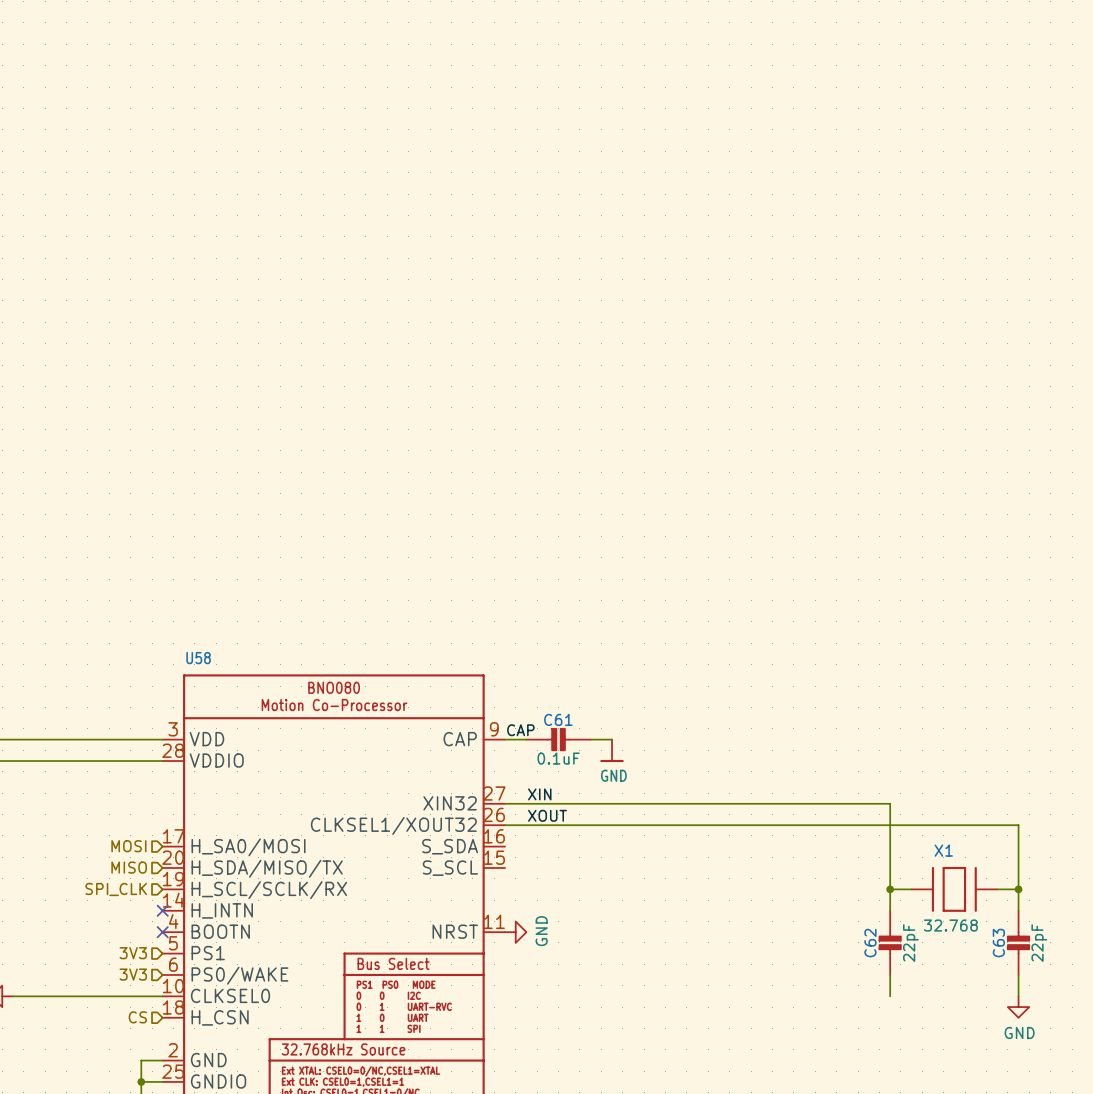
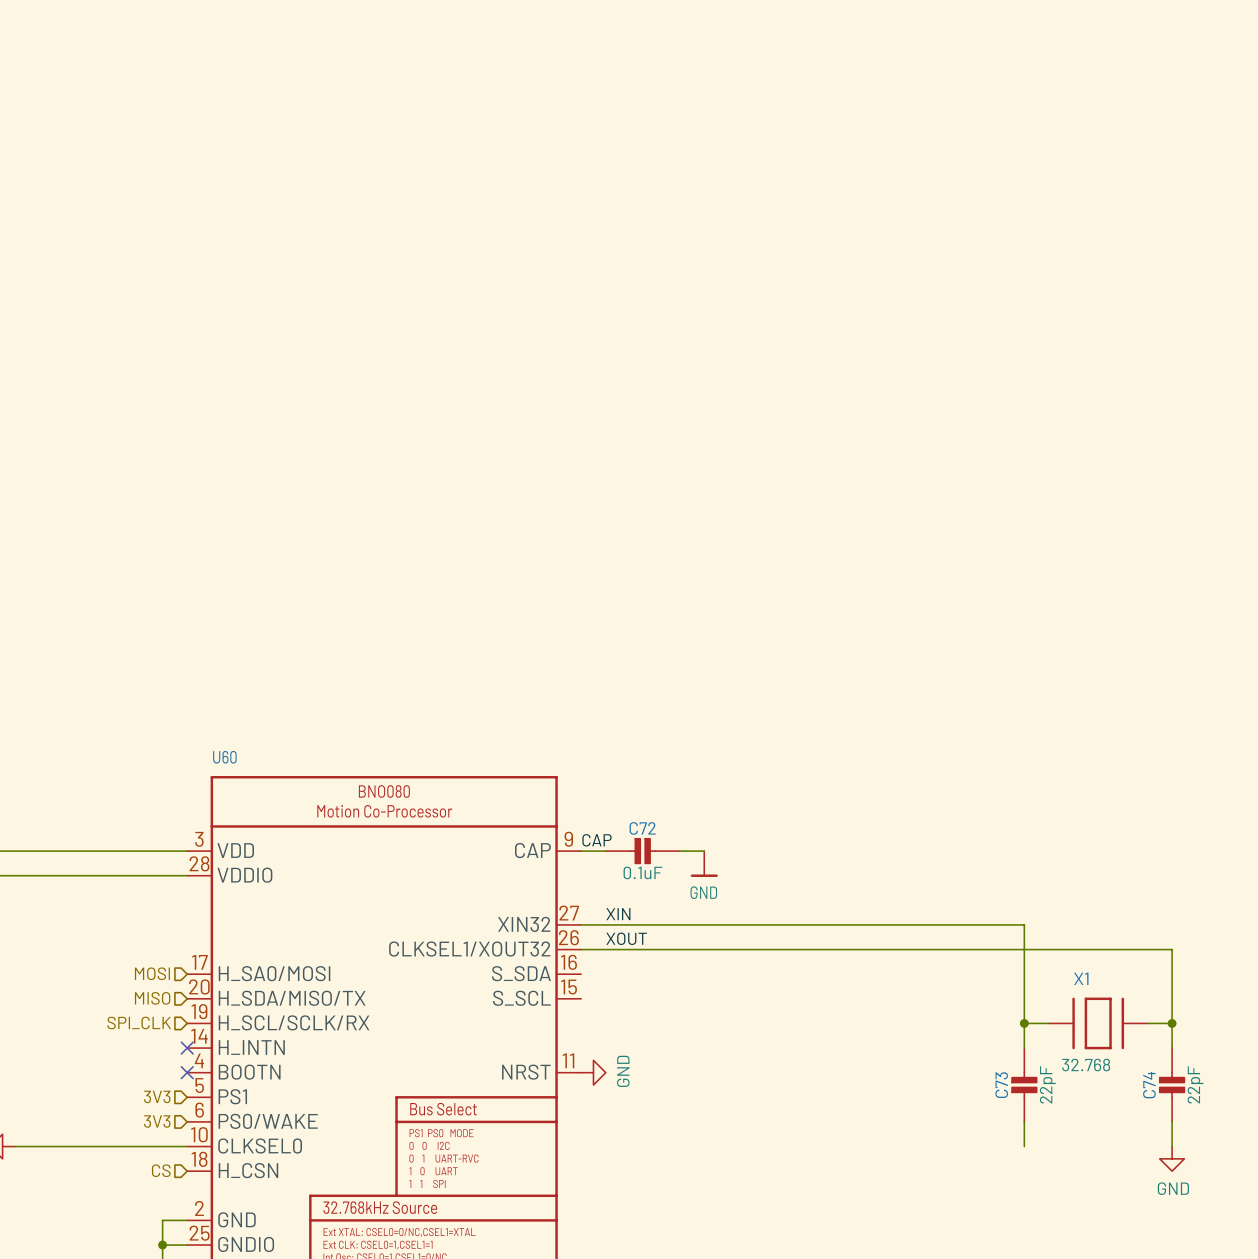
U58 name: U58 (198, 658) -> U60 (224, 757)
C61 name: C61 (558, 719) -> C72 (642, 828)
C62 name: C62 (870, 943) -> C73 (1001, 1085)
C63 name: C63 (998, 943) -> C74 (1149, 1085)

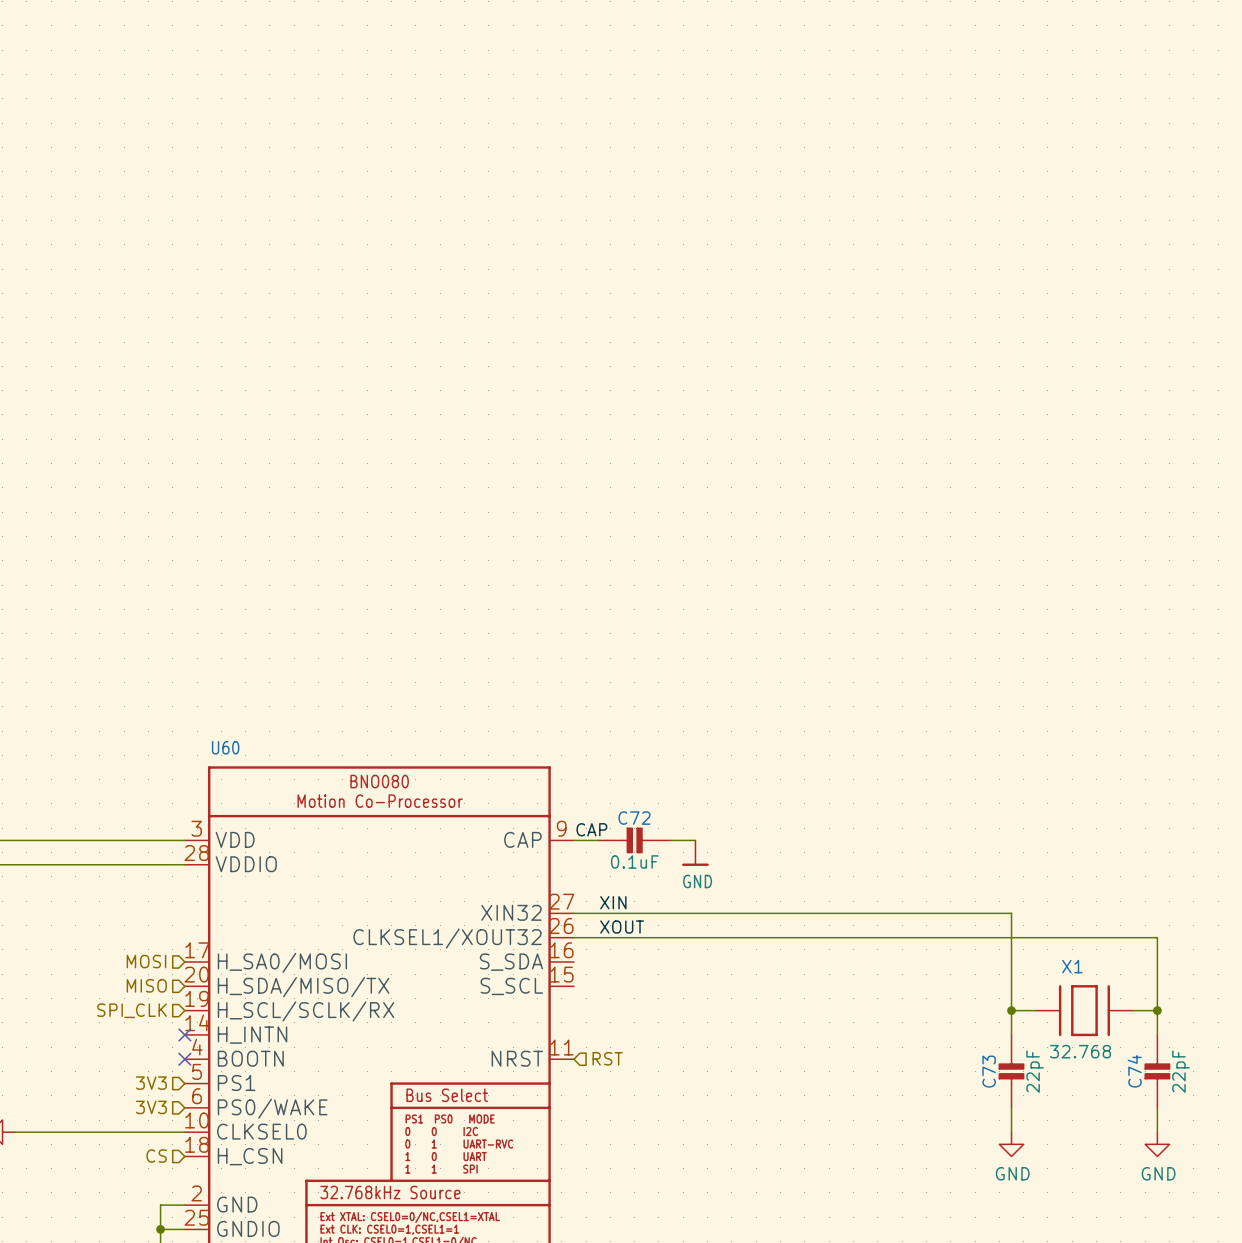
power symbol: GND (593, 1072) -> none
hierarchical label: none -> RST (607, 1058)
power symbol: none -> GND (1011, 1144)

